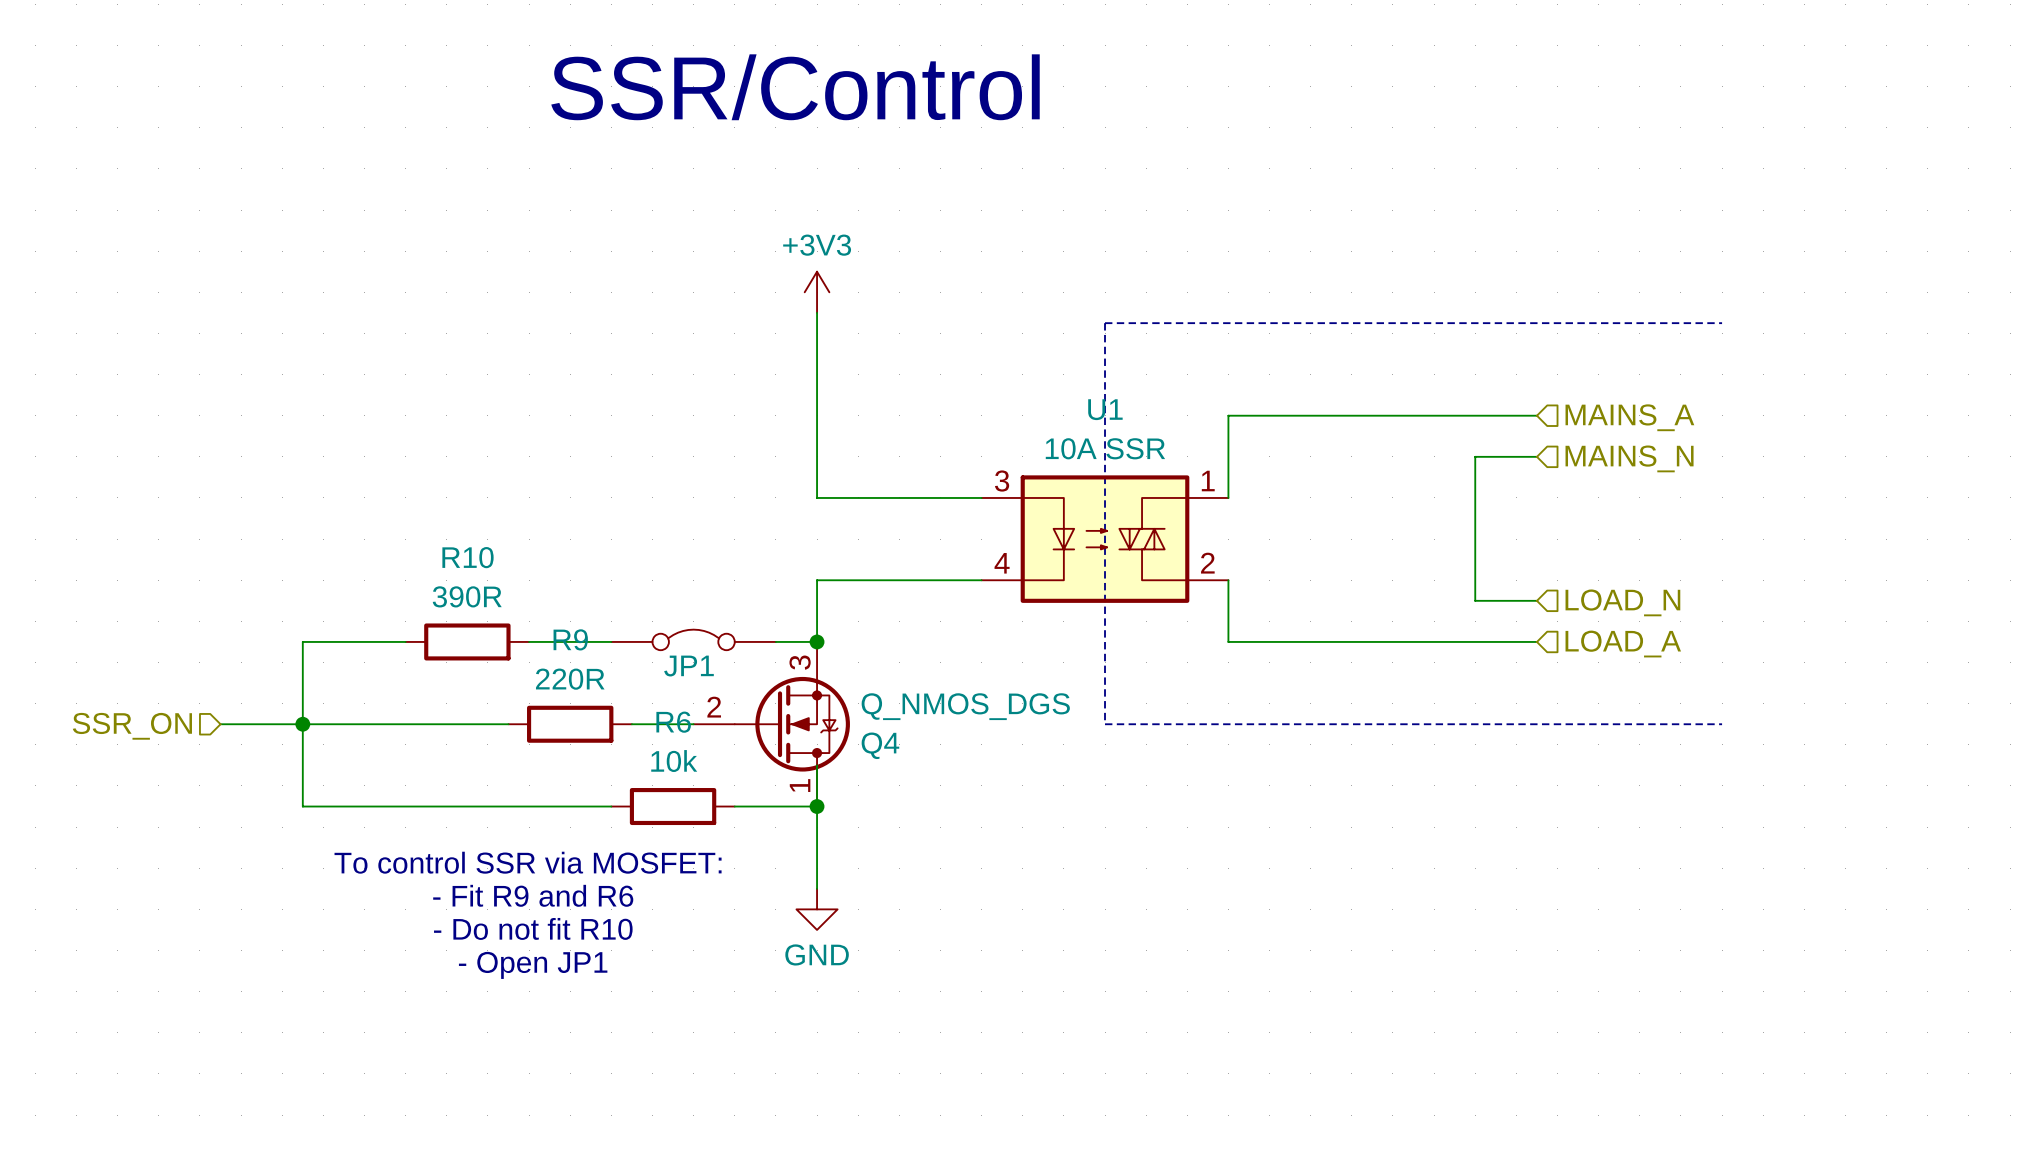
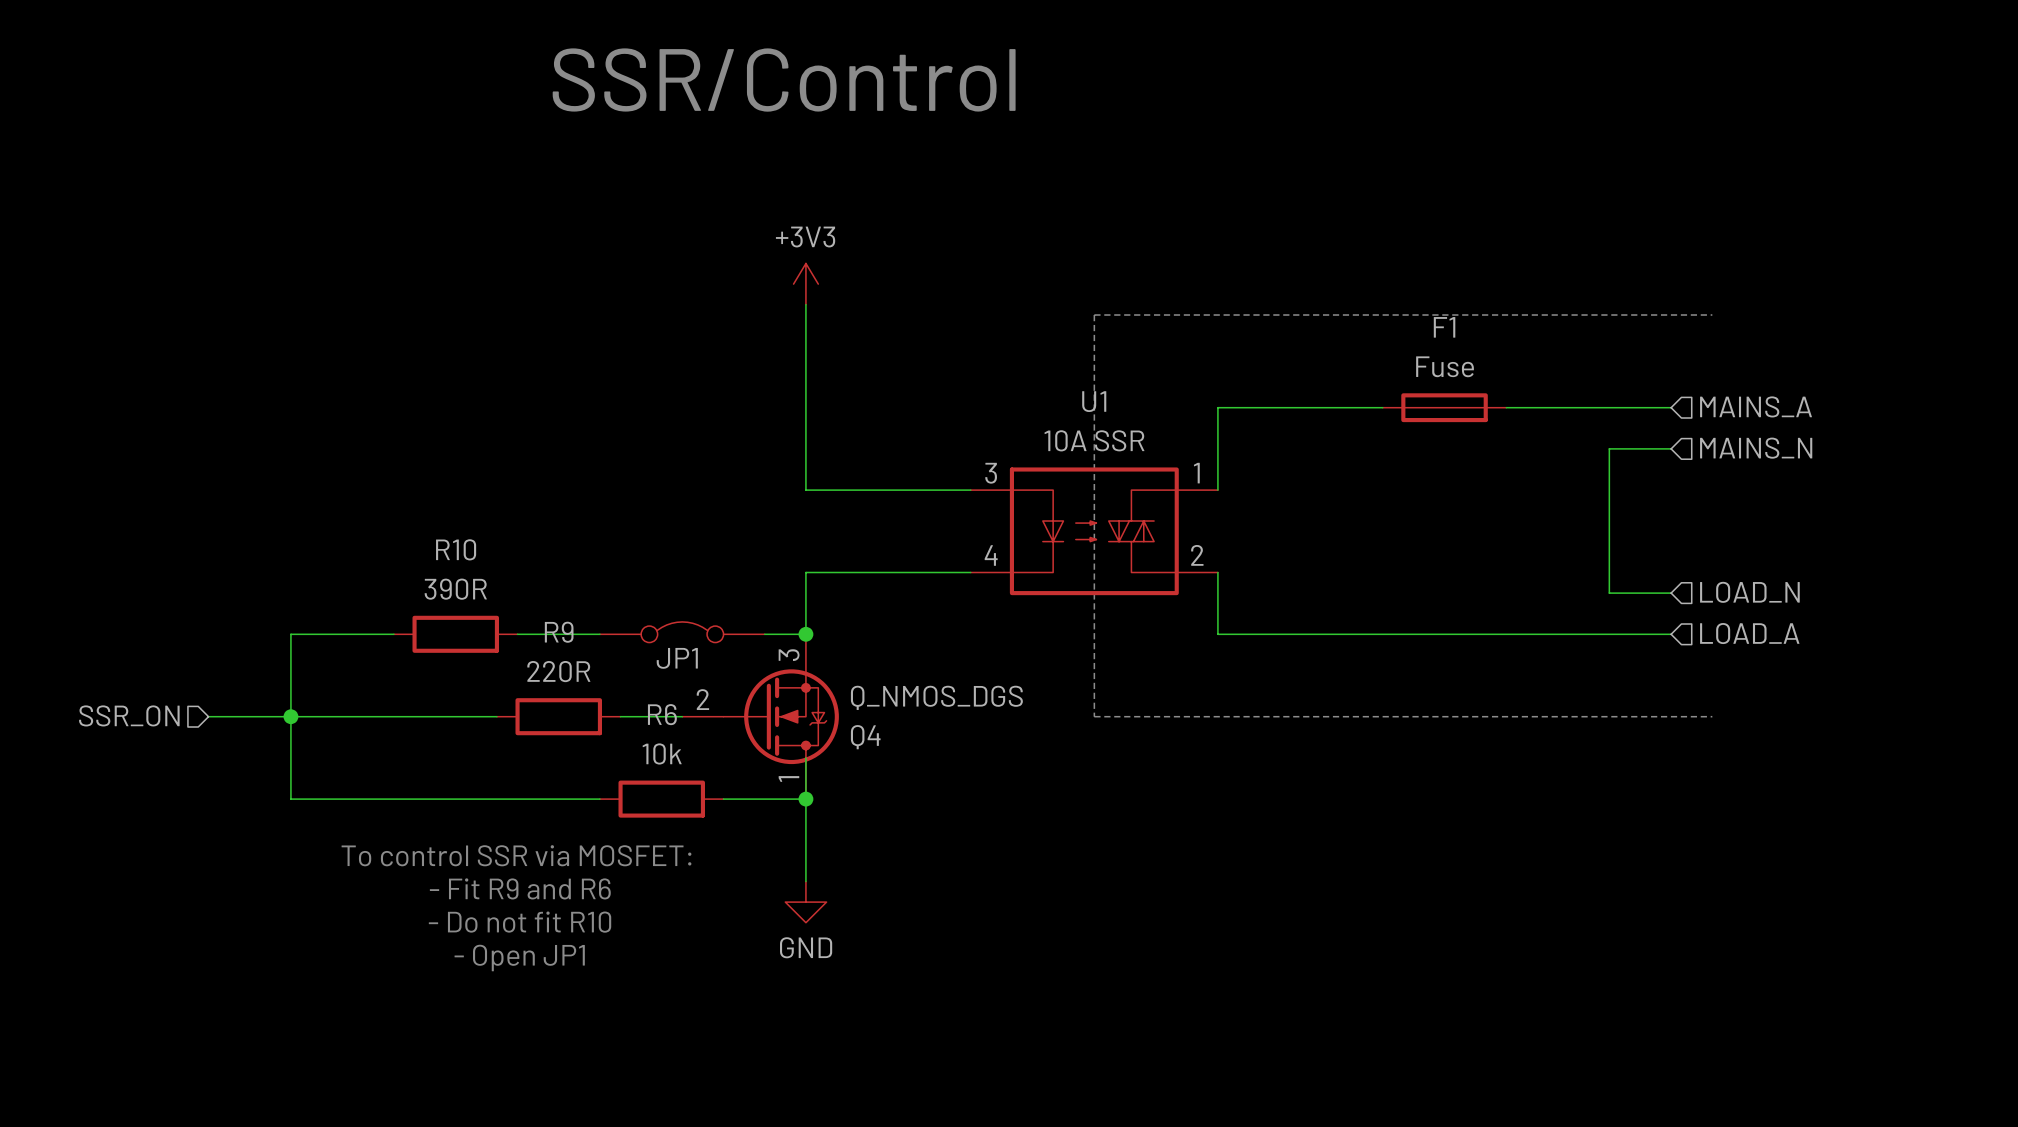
F1: none -> Fuse (1444, 407)
wire: none -> (1526, 407) (1671, 407)
hierarchical label position: MAINS_A (1629, 417) -> MAINS_A (1756, 406)
wire: (1536, 456) (1475, 456) (1475, 600) (1536, 600) -> (1671, 448) (1609, 448) (1609, 593) (1671, 593)
hierarchical label position: MAINS_N (1629, 458) -> MAINS_N (1756, 448)
hierarchical label position: LOAD_N (1622, 602) -> LOAD_N (1749, 592)
wire: none -> (1526, 634) (1671, 634)
hierarchical label position: LOAD_A (1623, 644) -> LOAD_A (1749, 633)

